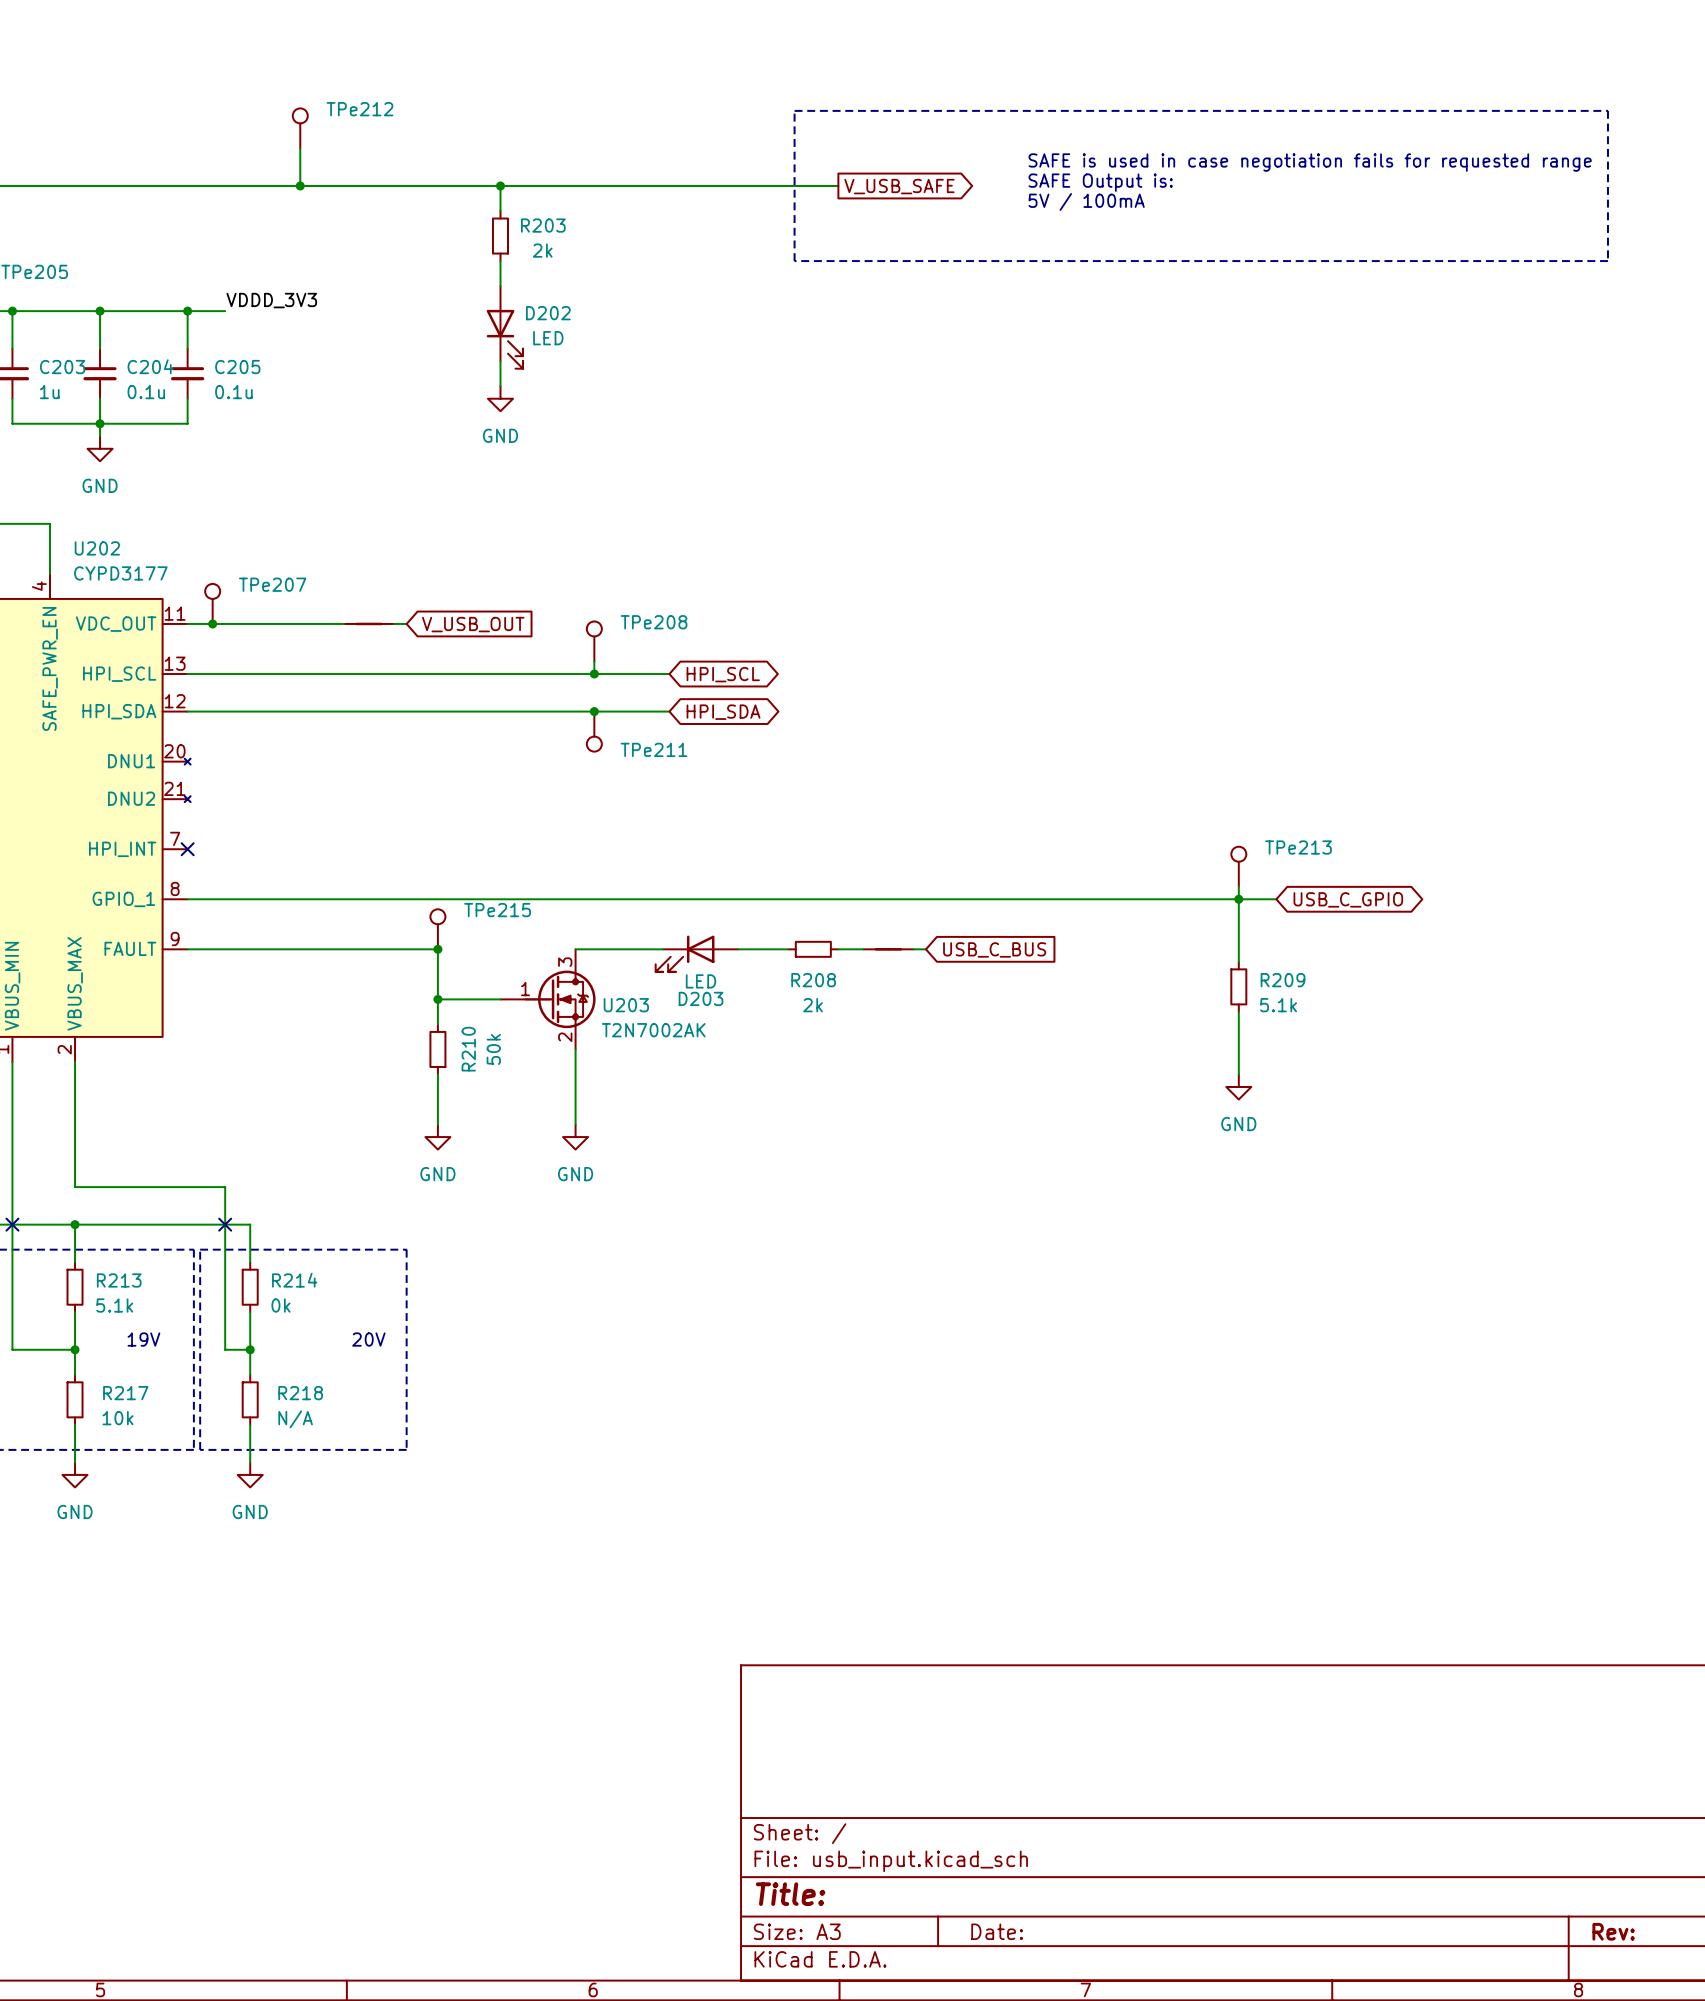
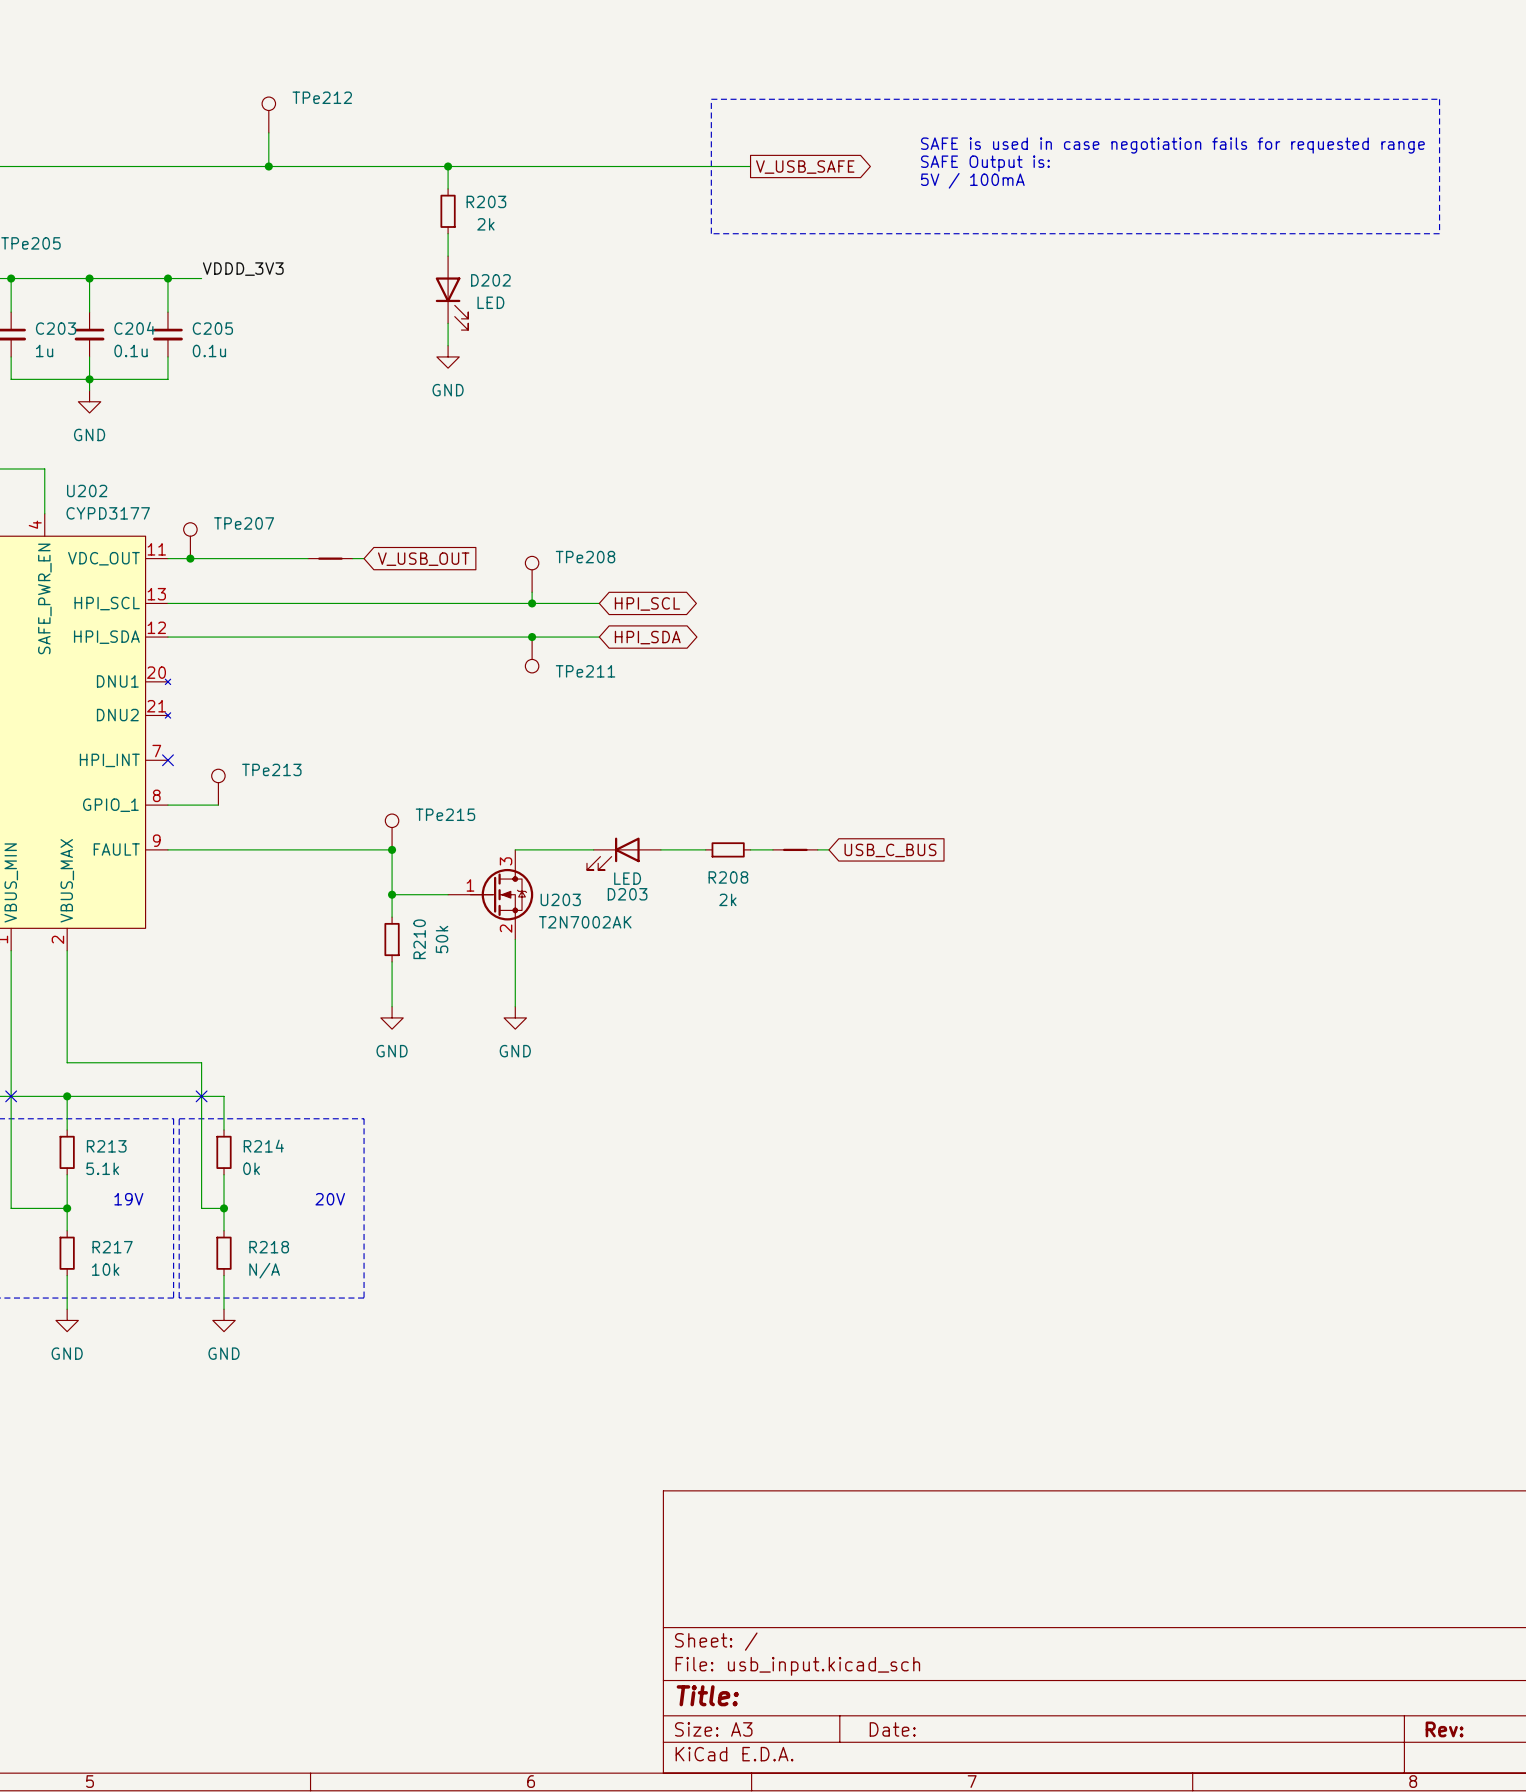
TPe213 position: (1238, 866) -> (218, 787)
wire: (1238, 886) (1238, 961) -> none
wire: (243, 899) (1276, 899) -> none
junction: (1238, 899) -> none
global label: USB_C_GPIO (1348, 899) -> none
R209: 5.1k (1238, 986) -> none
wire: (1238, 1011) (1238, 1074) -> none
power symbol: GND (1238, 1086) -> none

